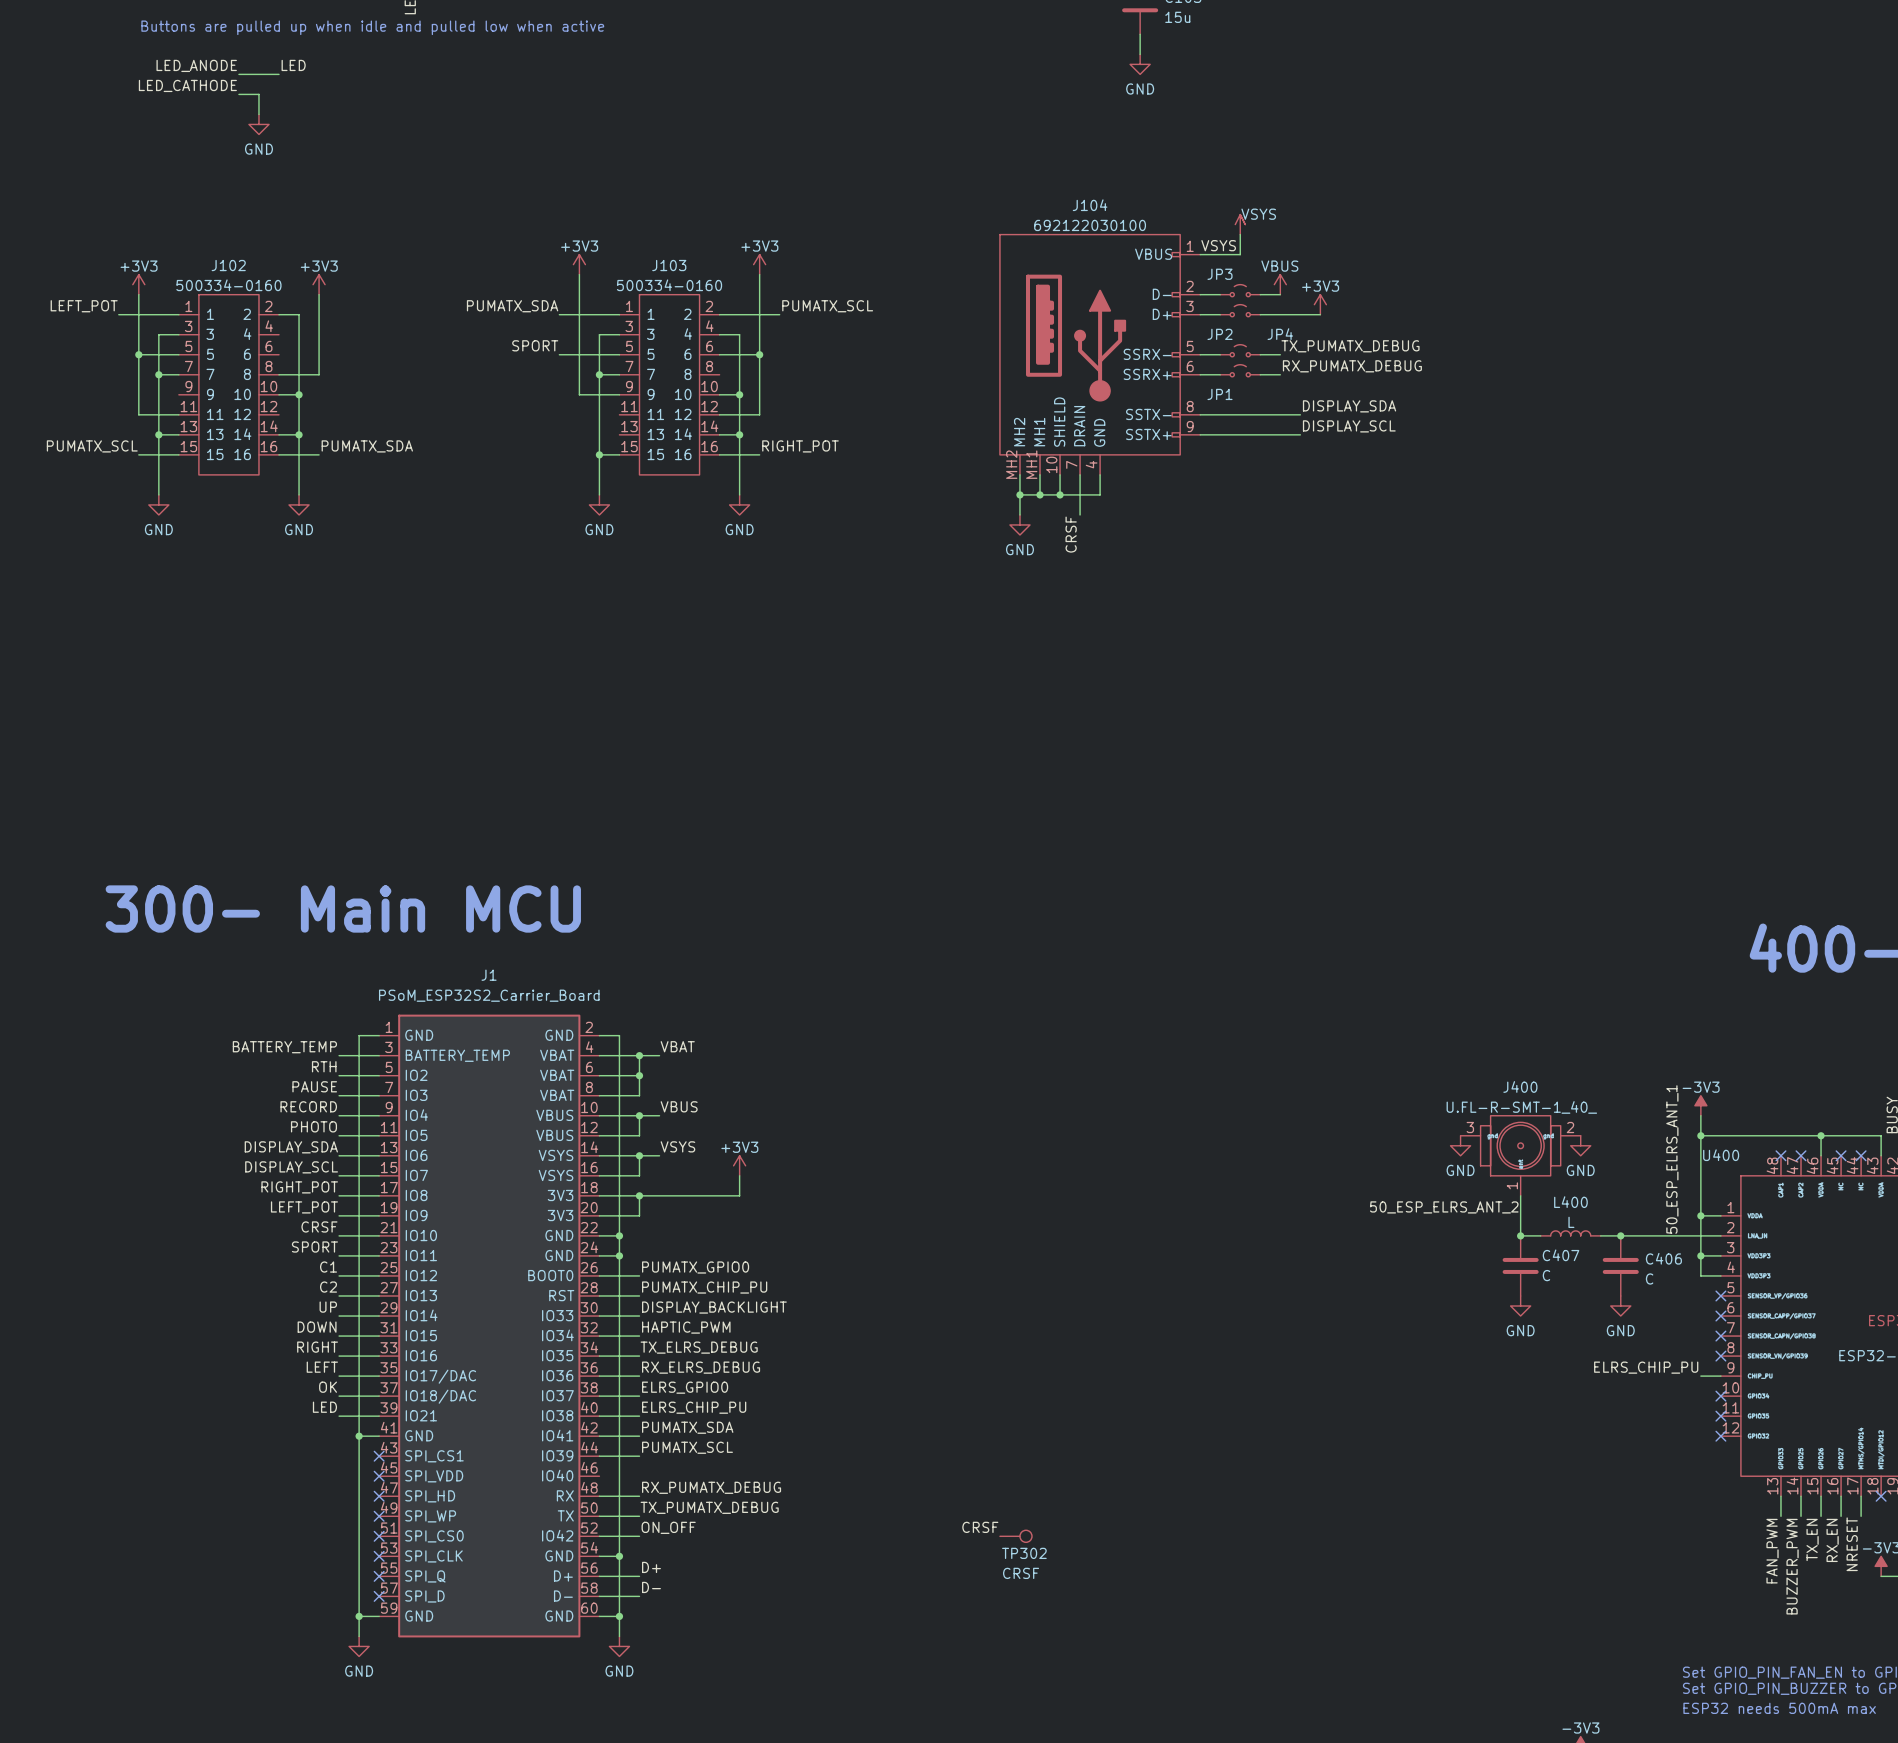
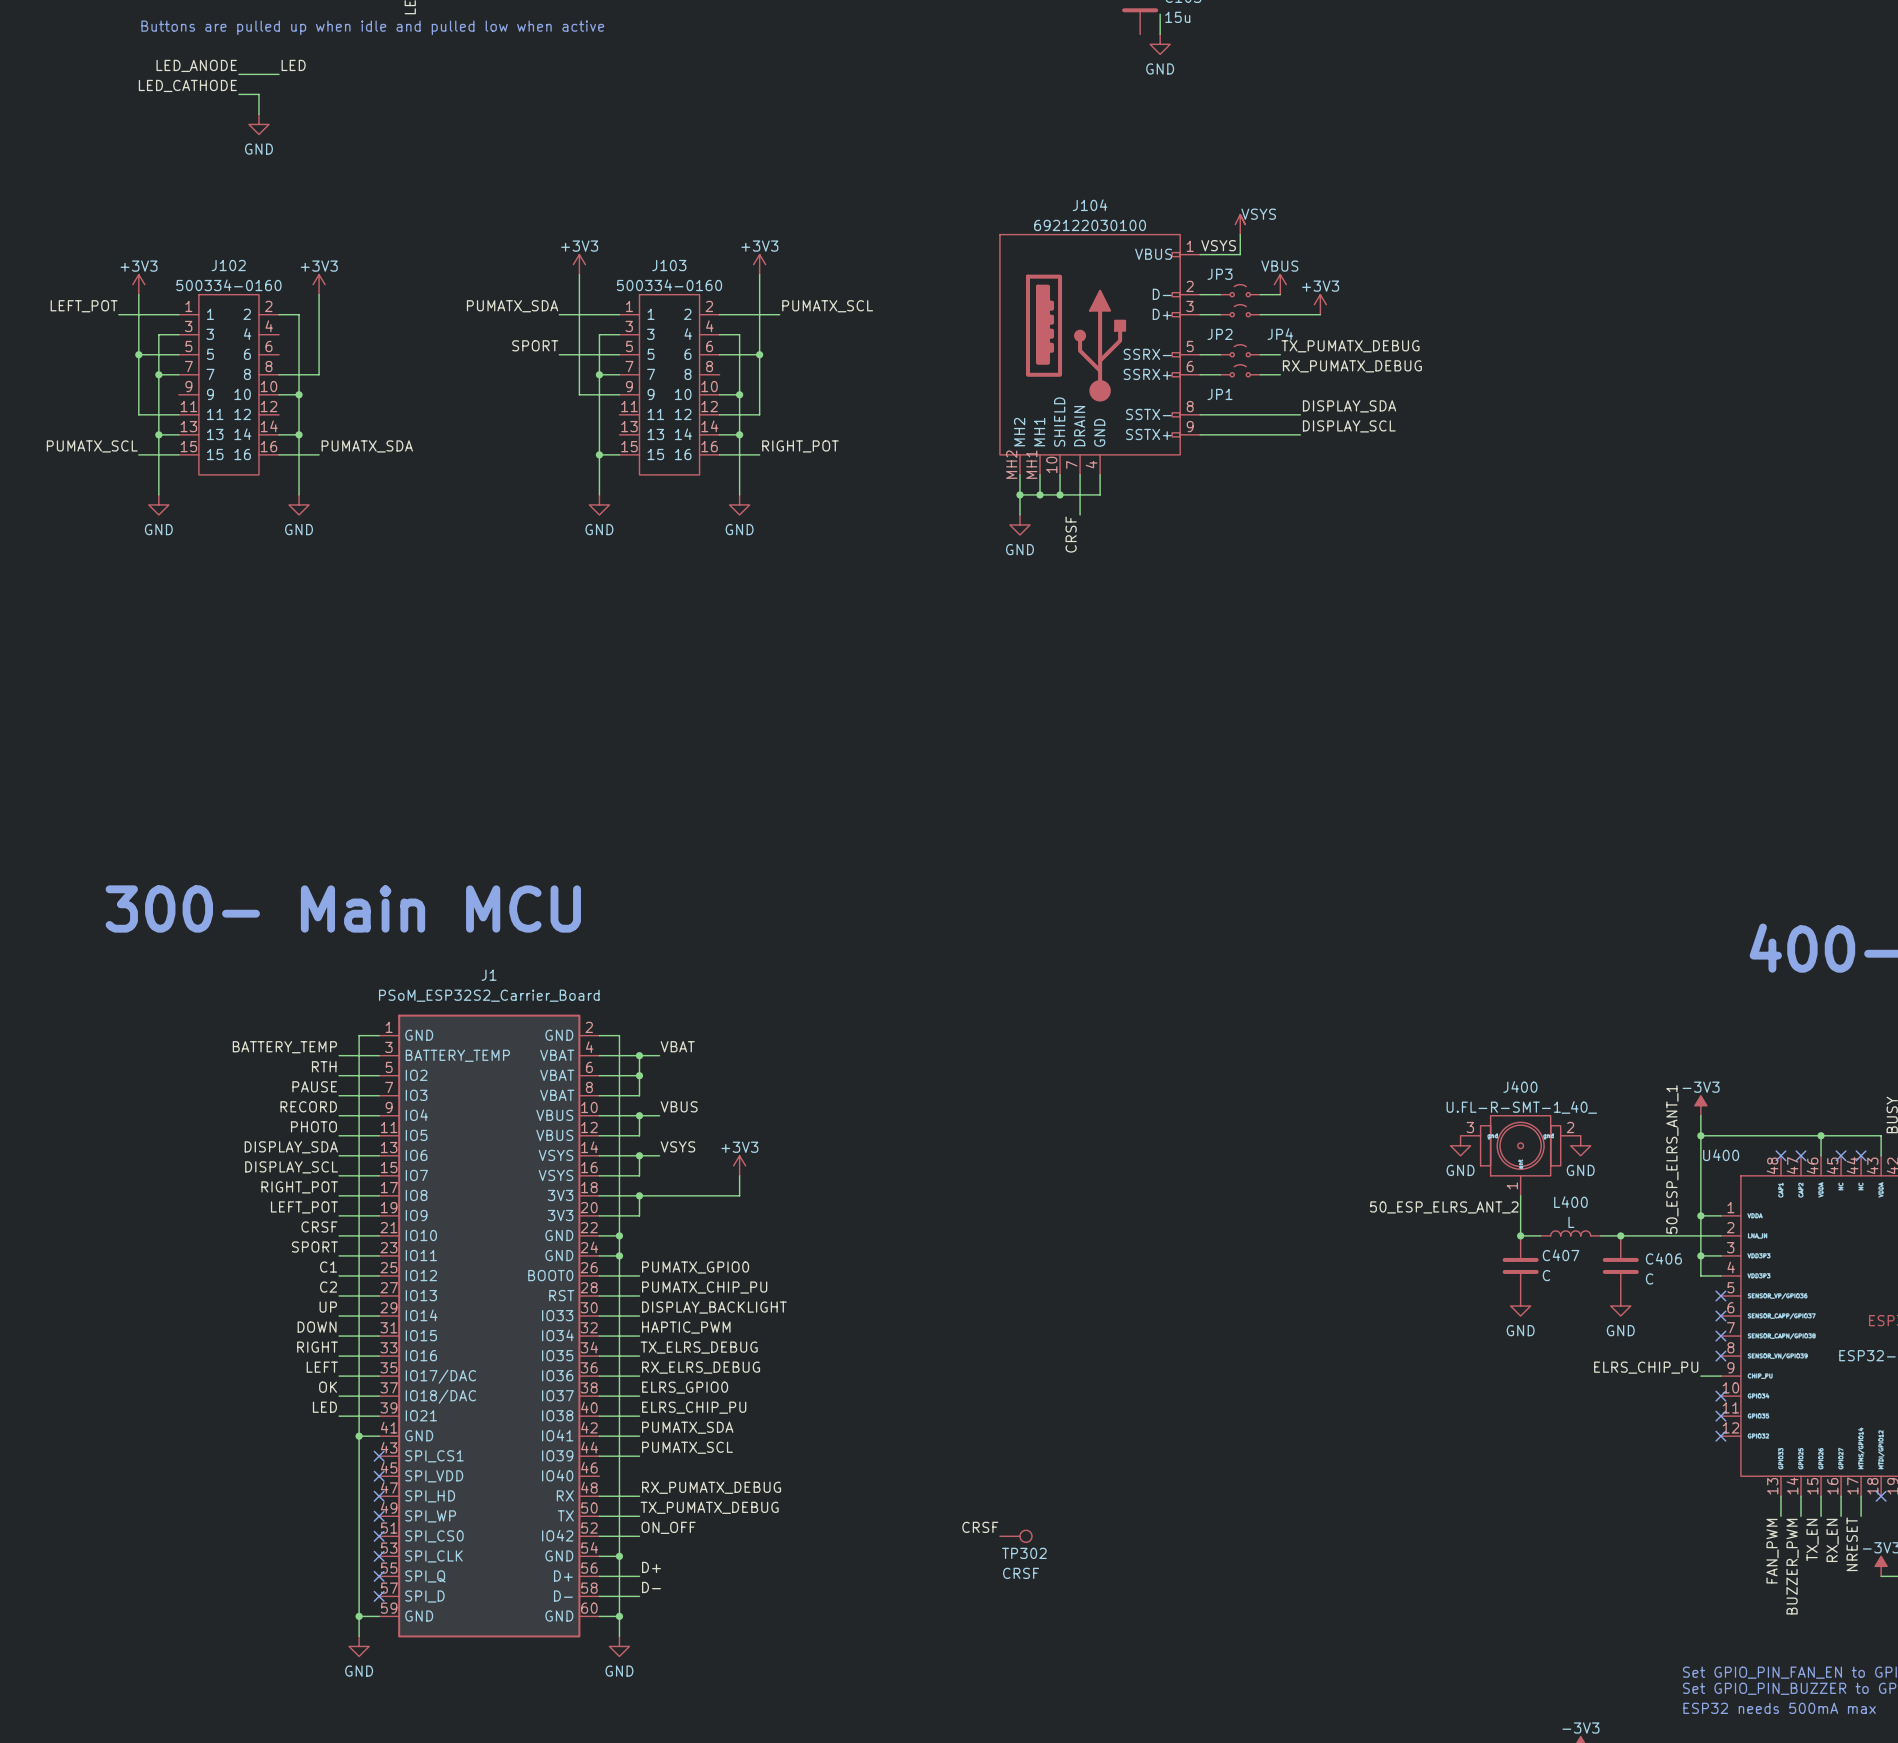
wire: (1140, 34) (1140, 54) -> (1160, 14) (1160, 34)
power symbol position: GND (1140, 64) -> GND (1160, 44)

